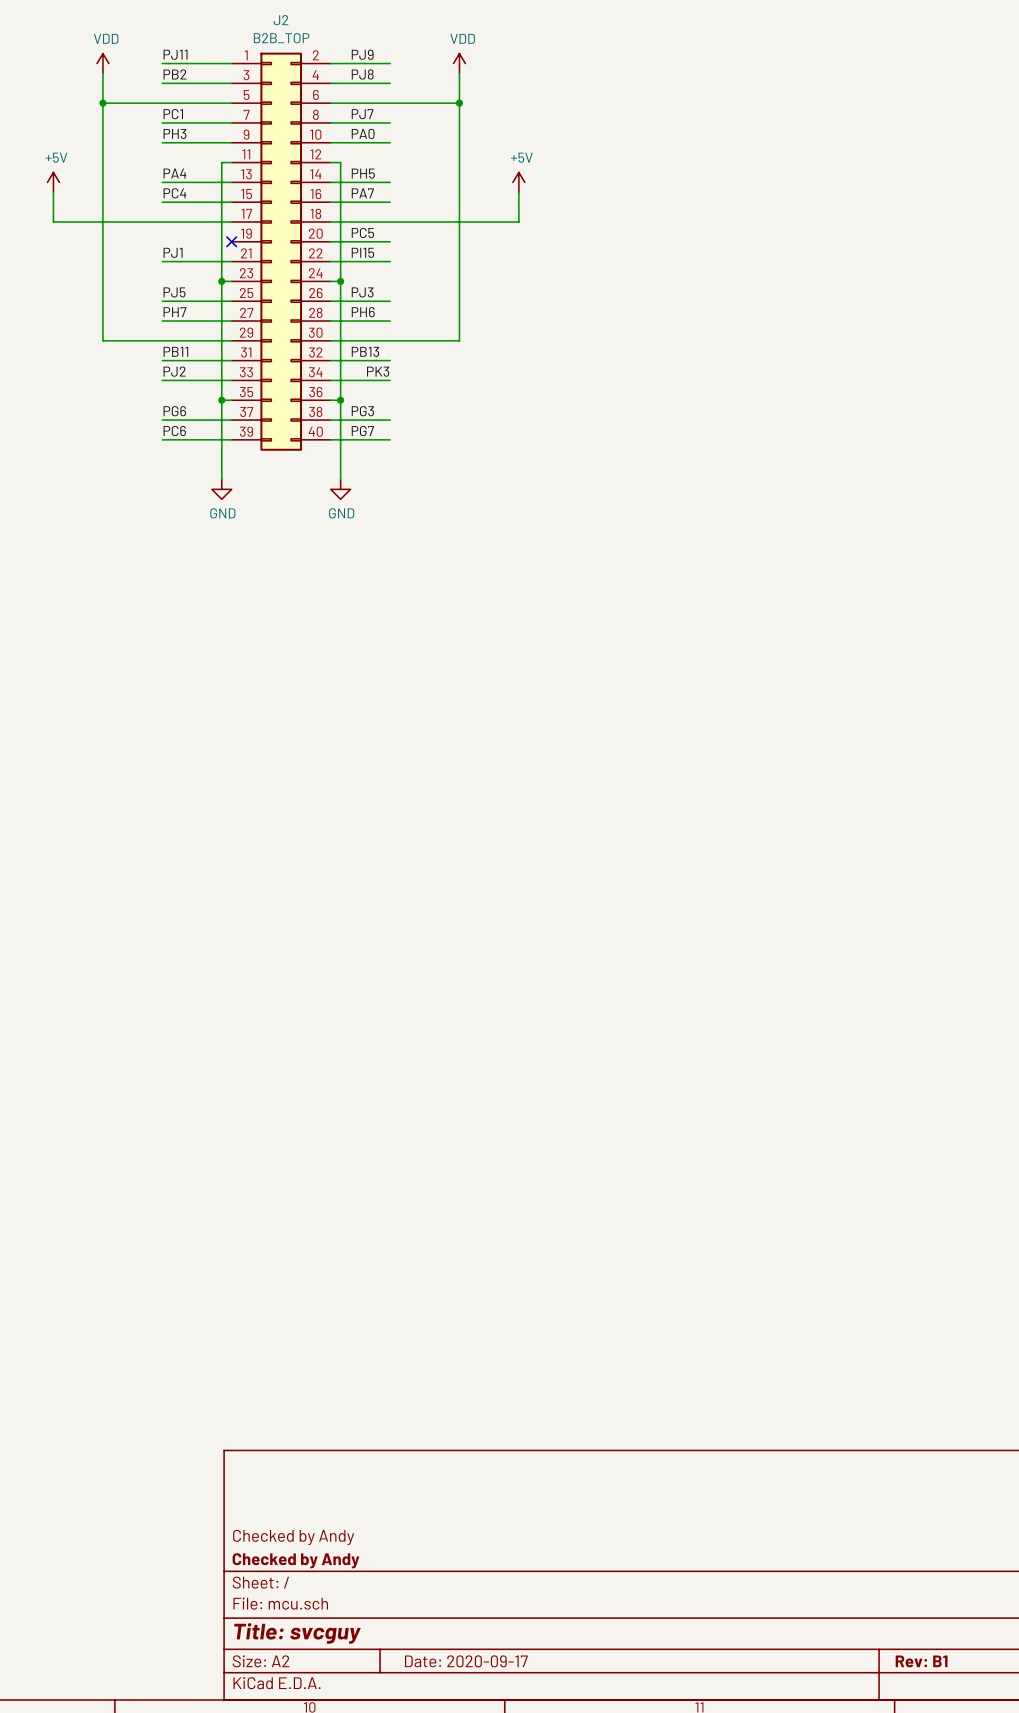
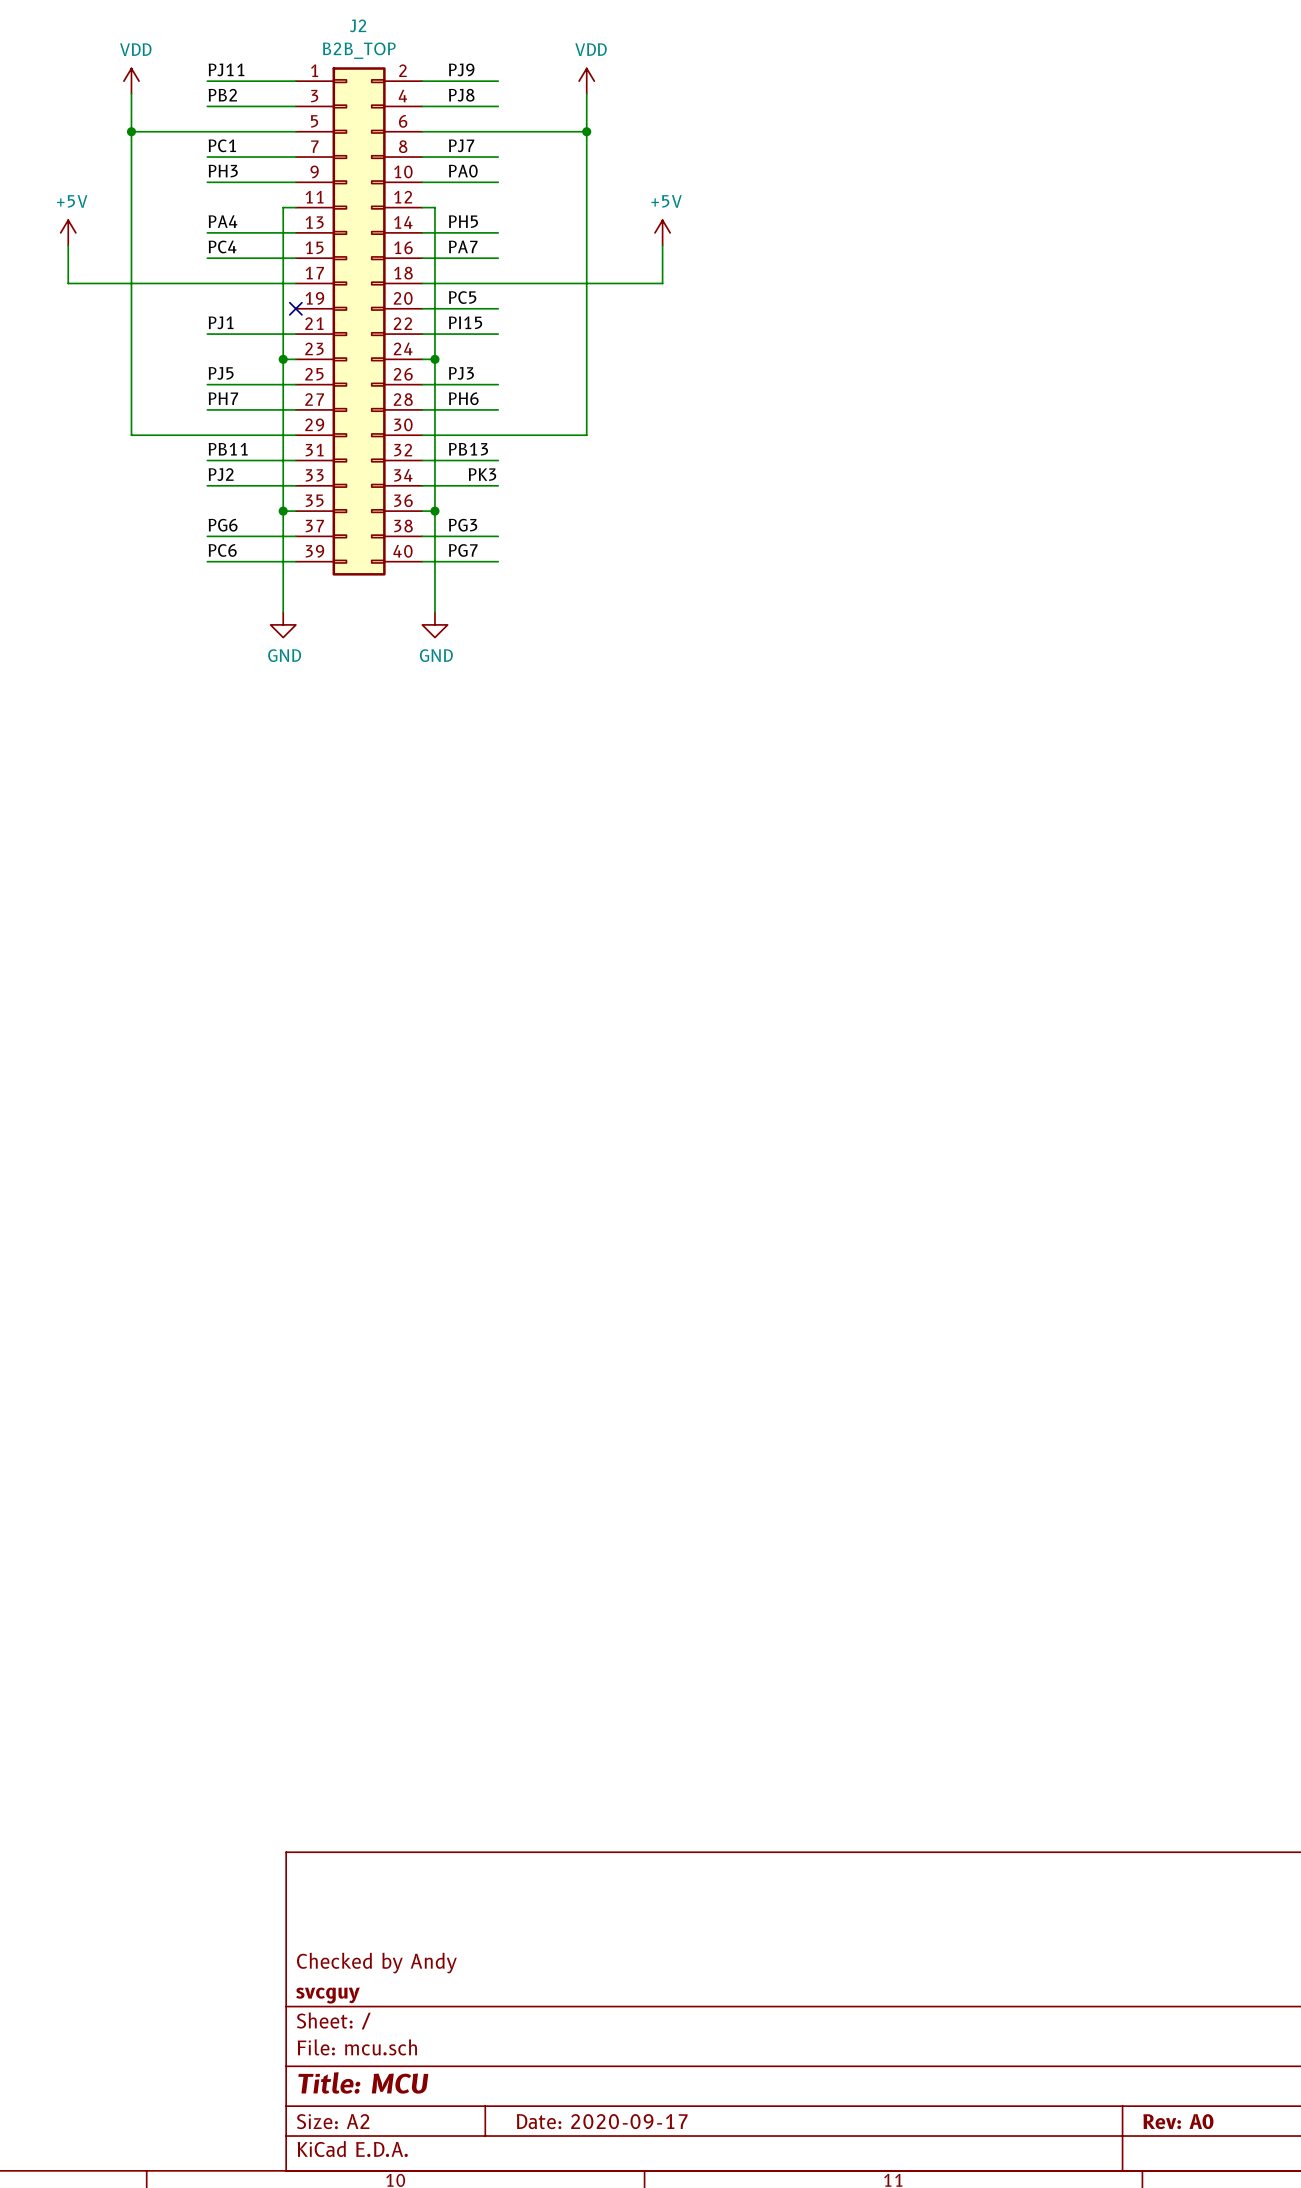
title block: Checked by Andy (295, 1560) -> svcguy (328, 1995)
title block: Title: svcguy (297, 1633) -> Title: MCU (363, 2082)
title block: Rev: B1 (921, 1661) -> Rev: A0 (1178, 2121)

